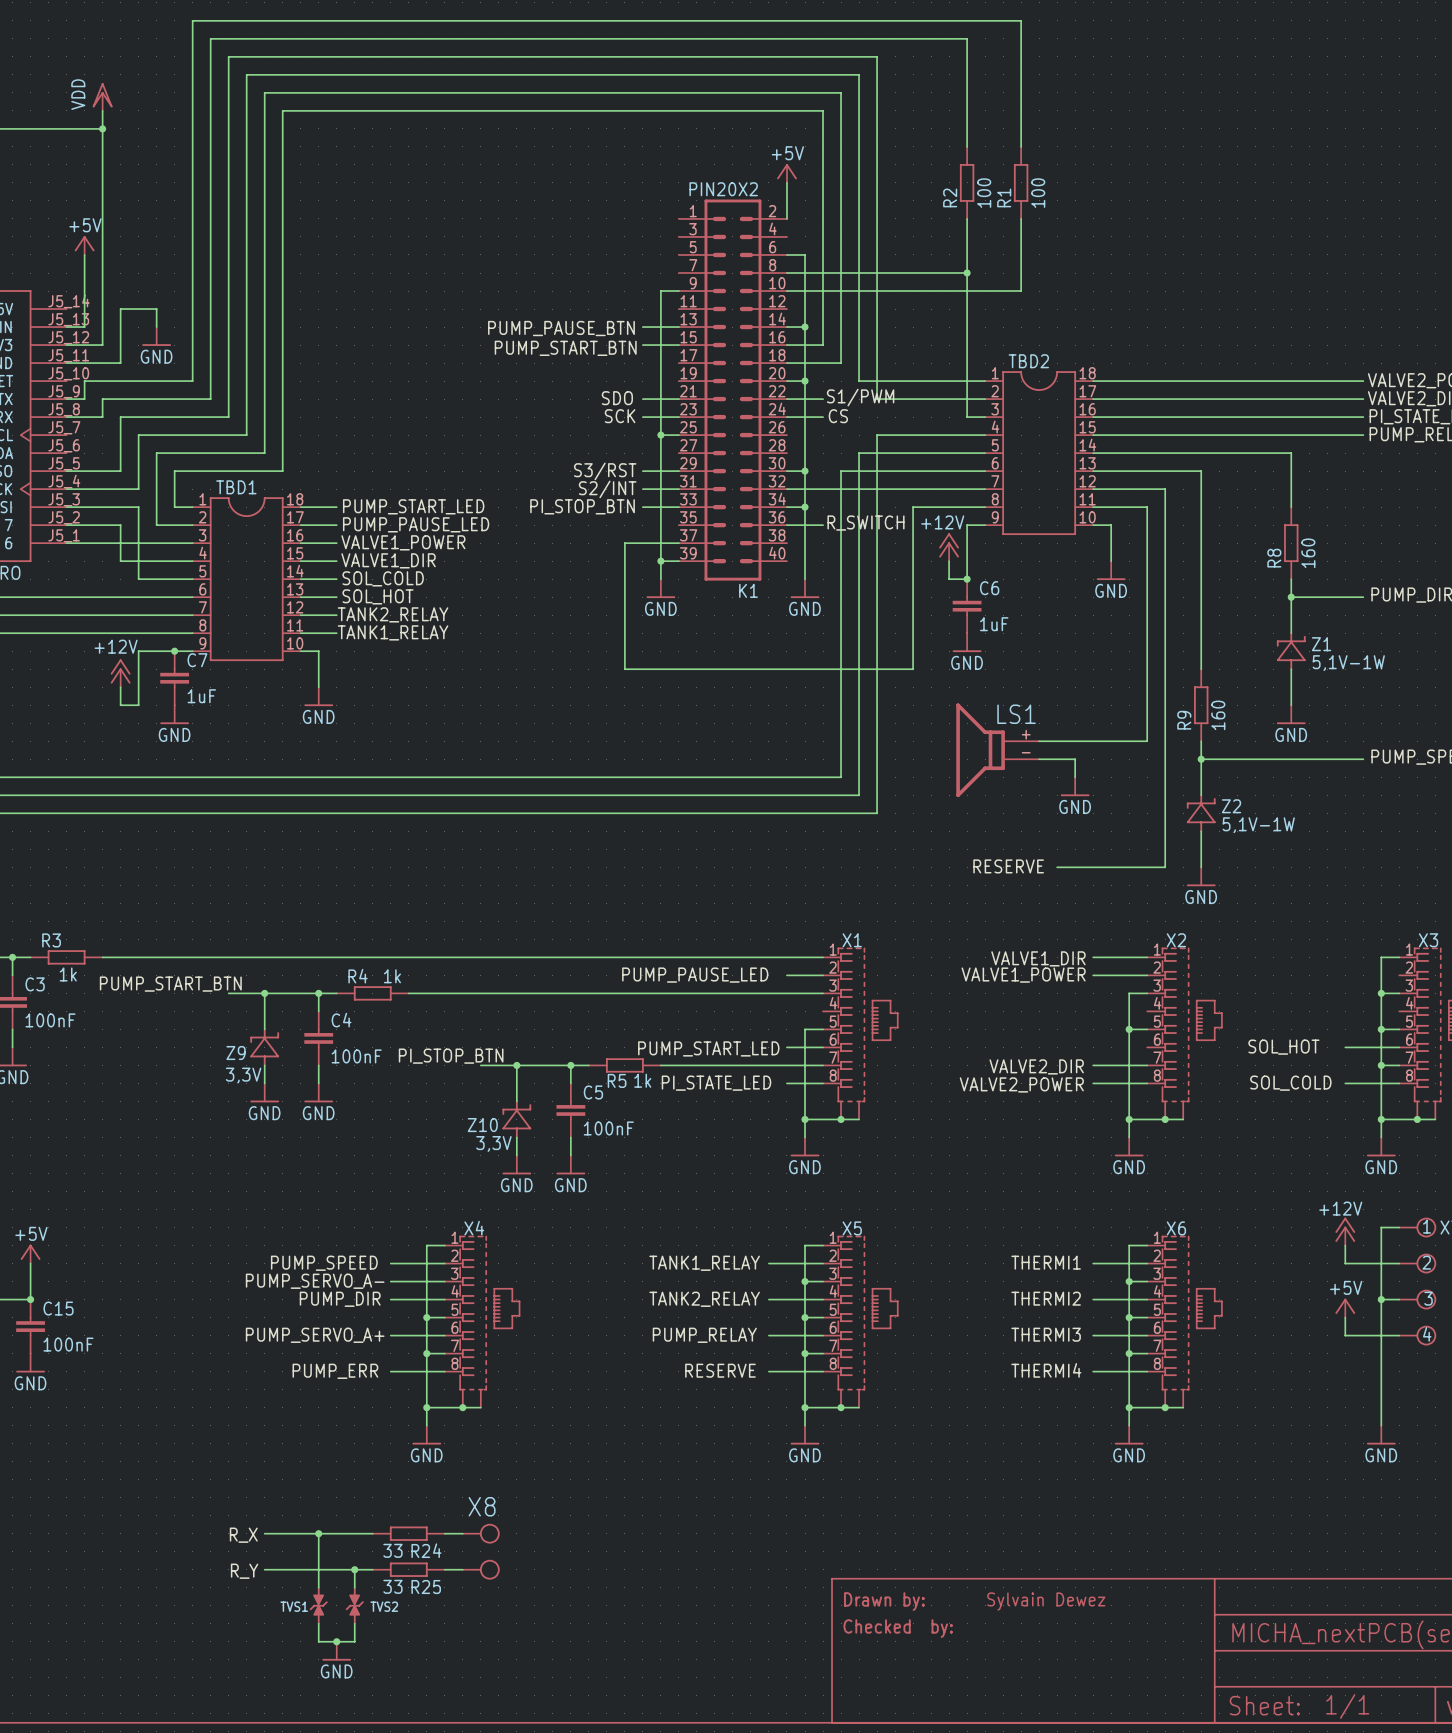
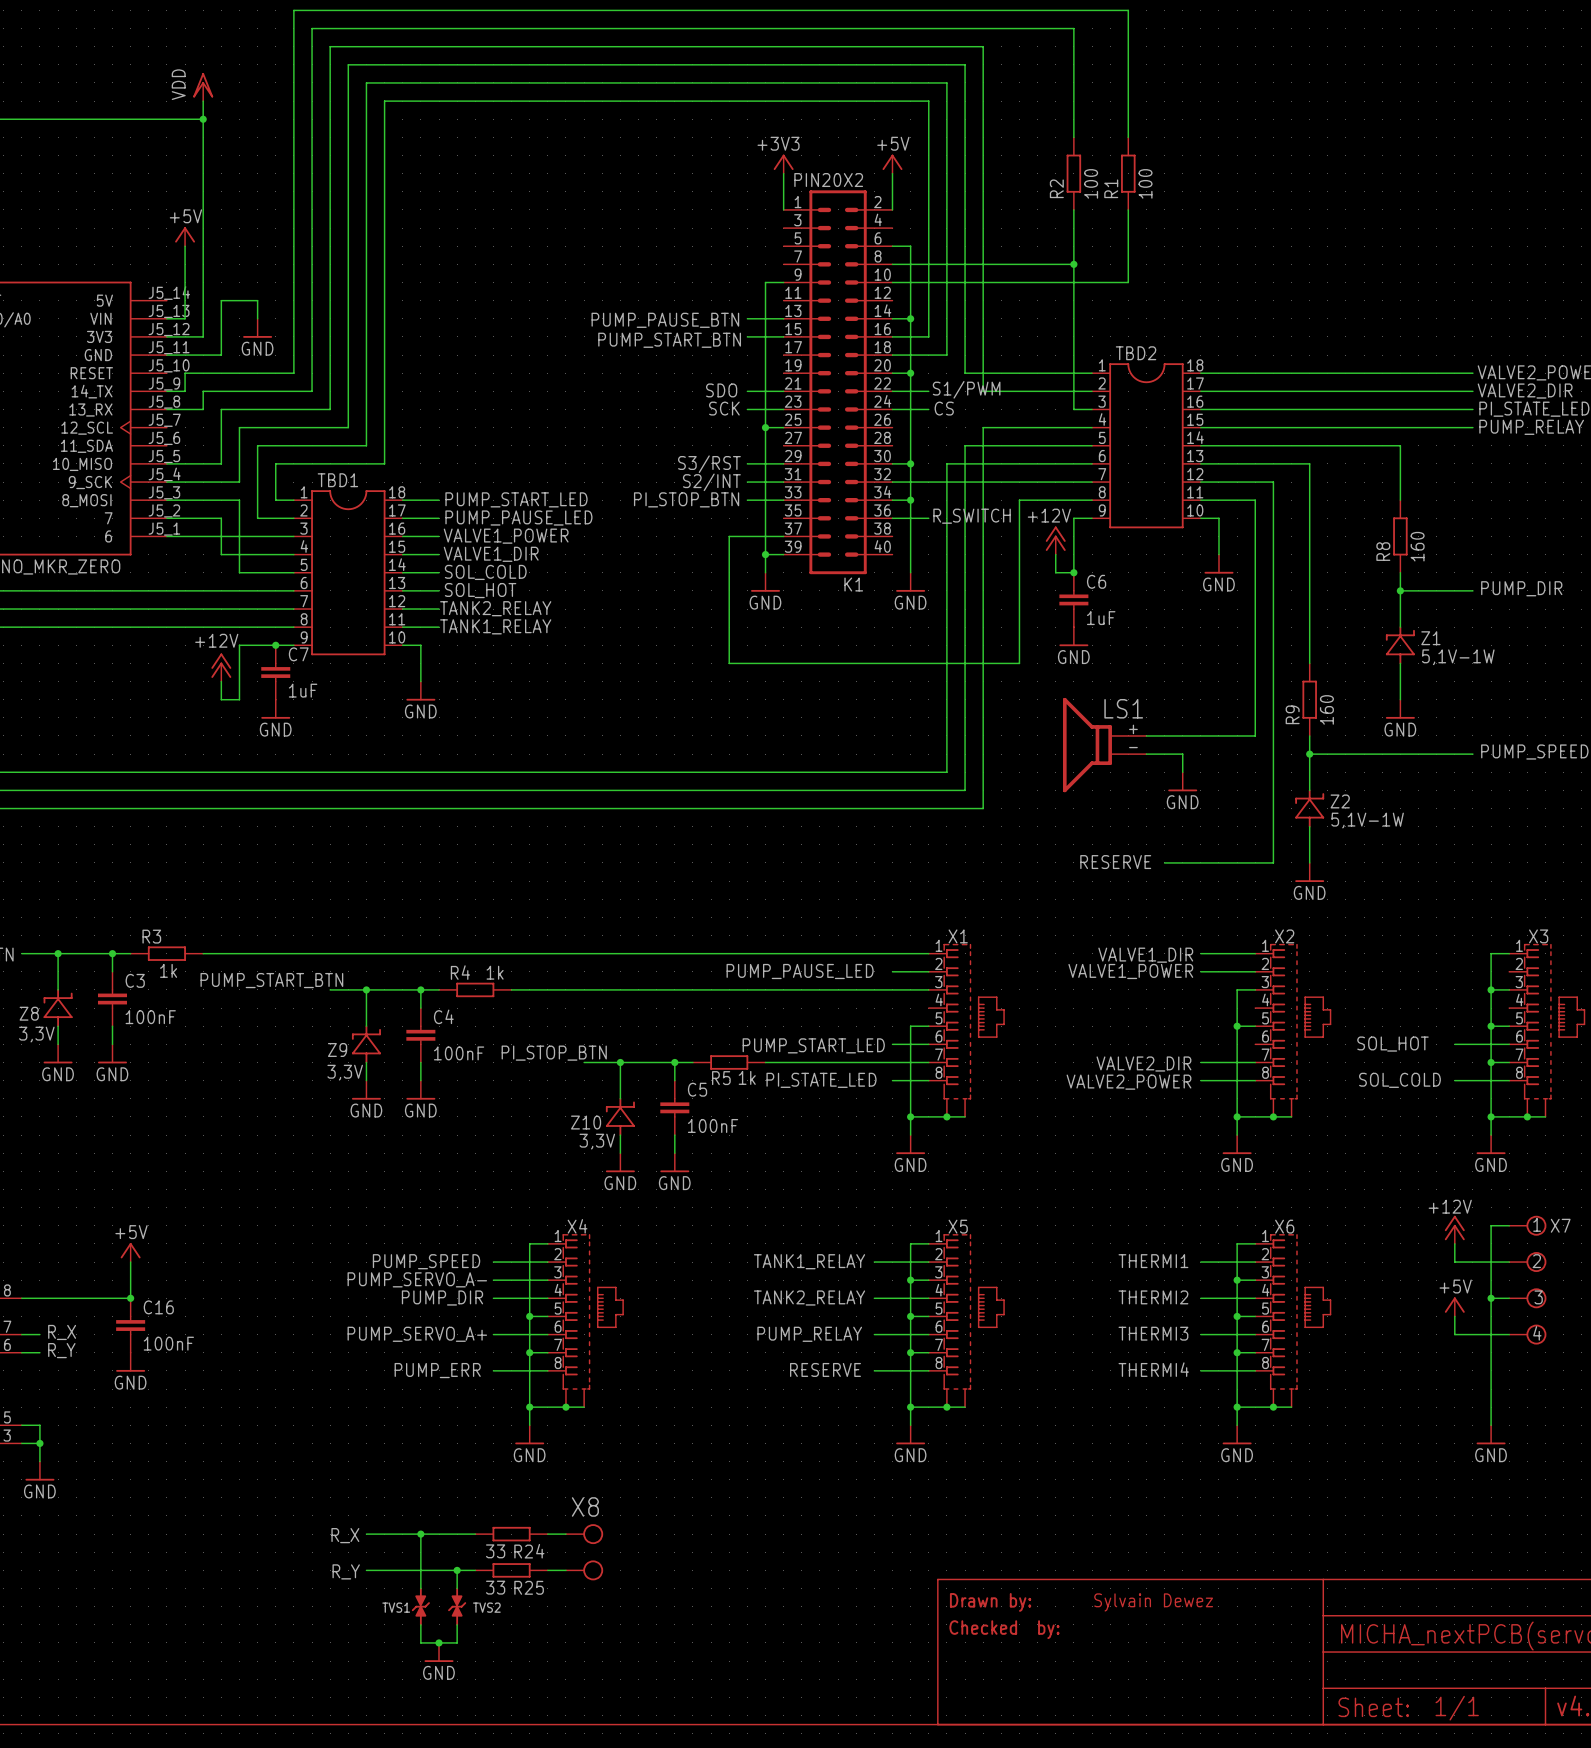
power symbol: none -> +3V3 (783, 164)
wire: none -> (783, 173) (783, 209)
C15 name: C15 (58, 1308) -> C16 (158, 1307)

